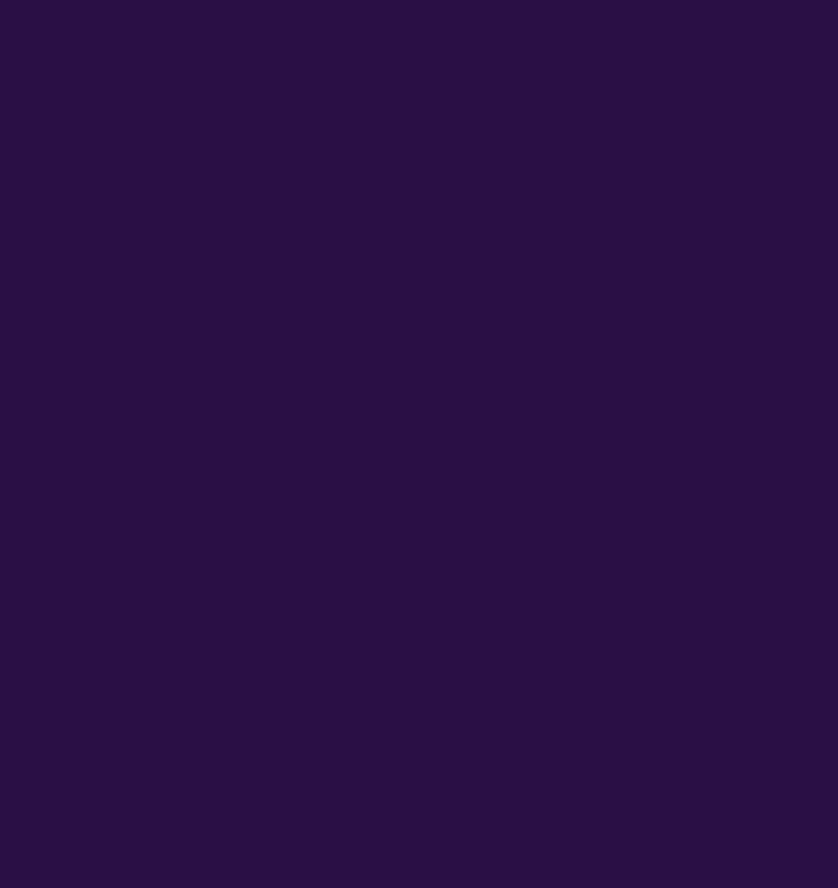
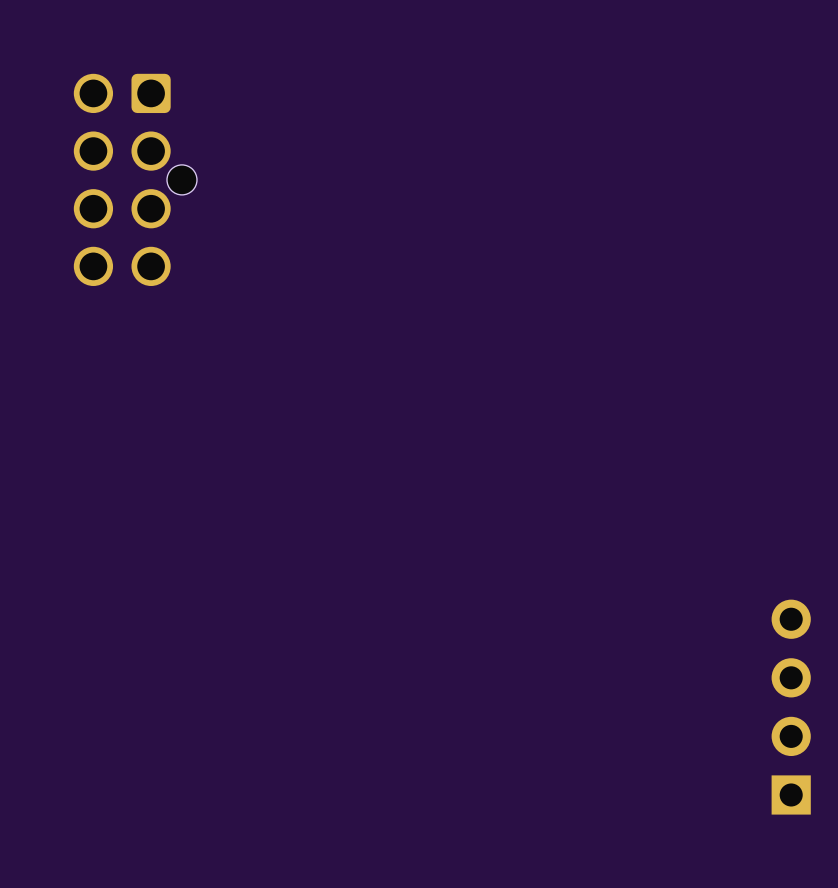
part: none -> (135, 179)
part: none -> (791, 707)

